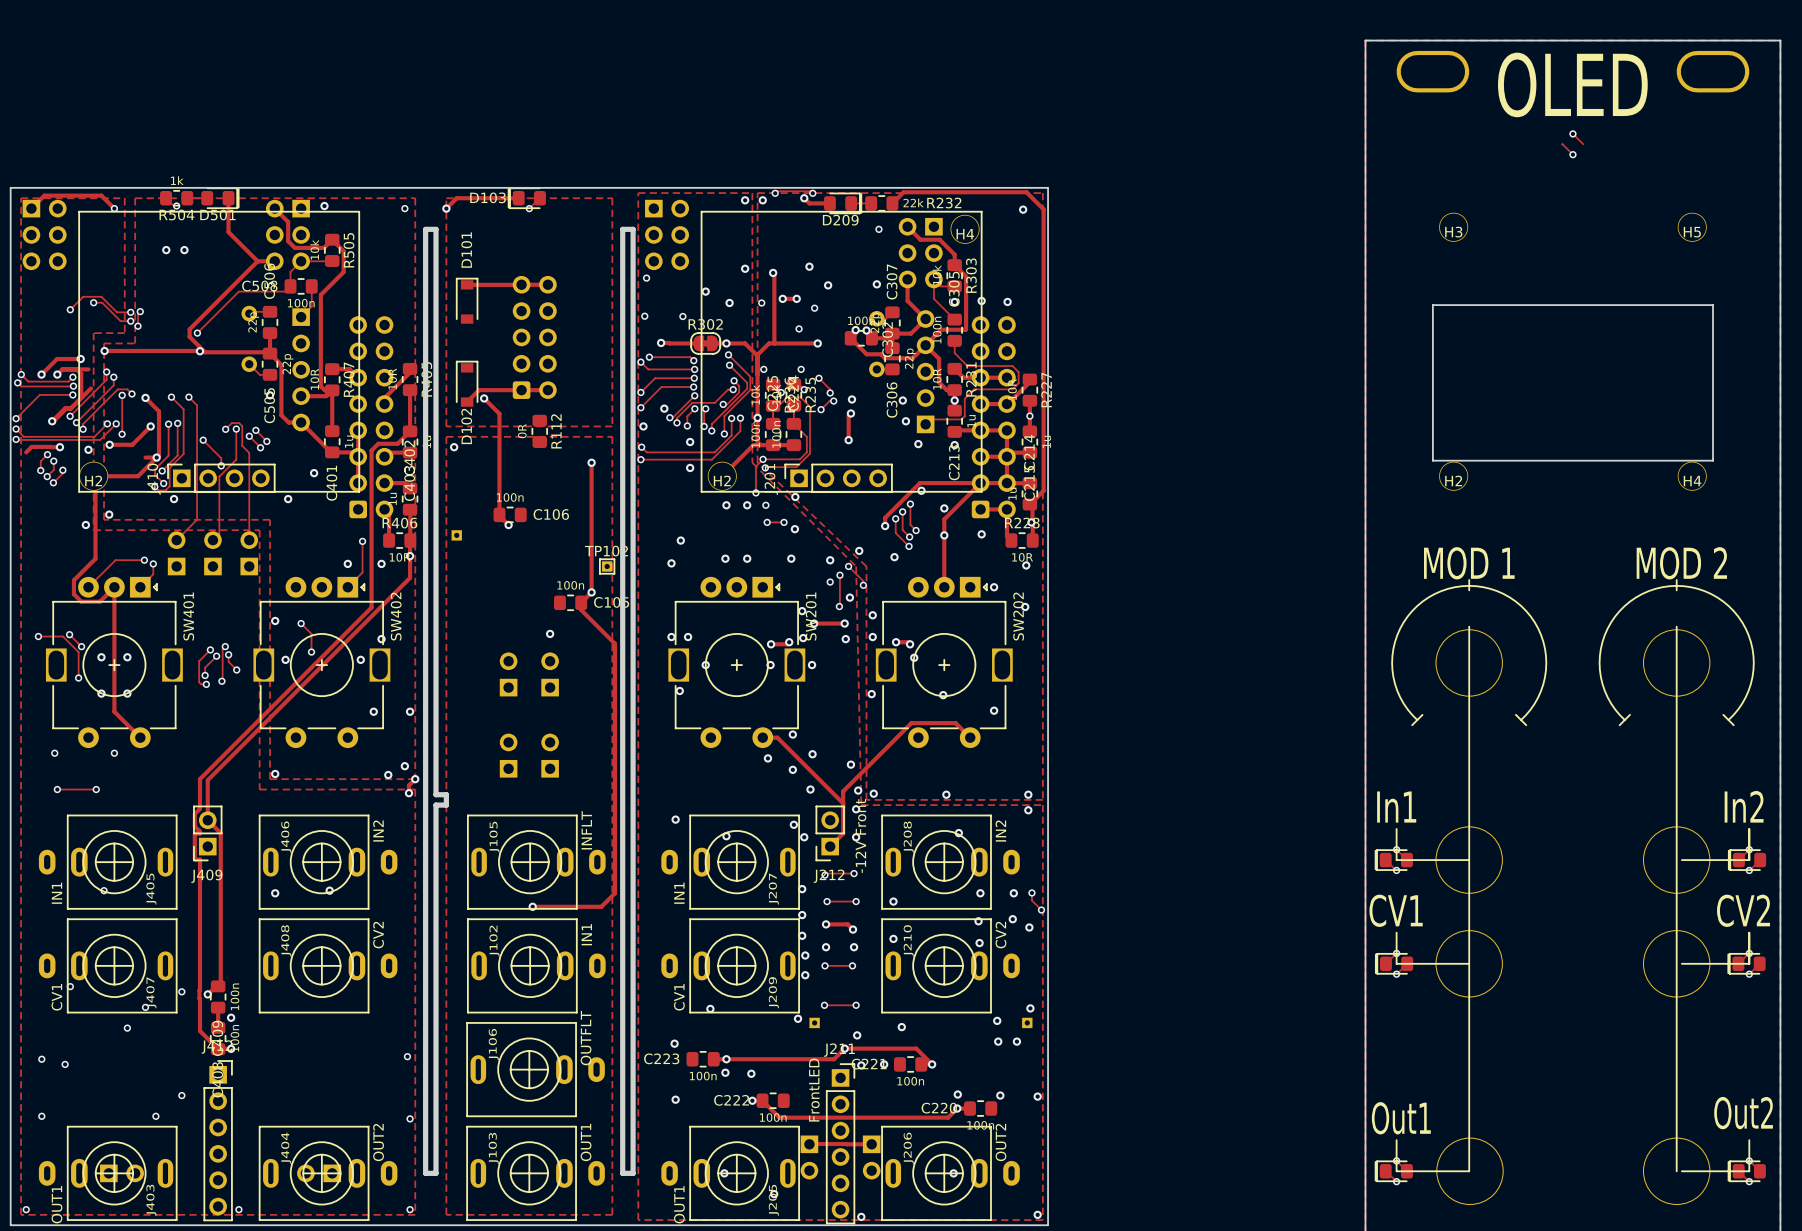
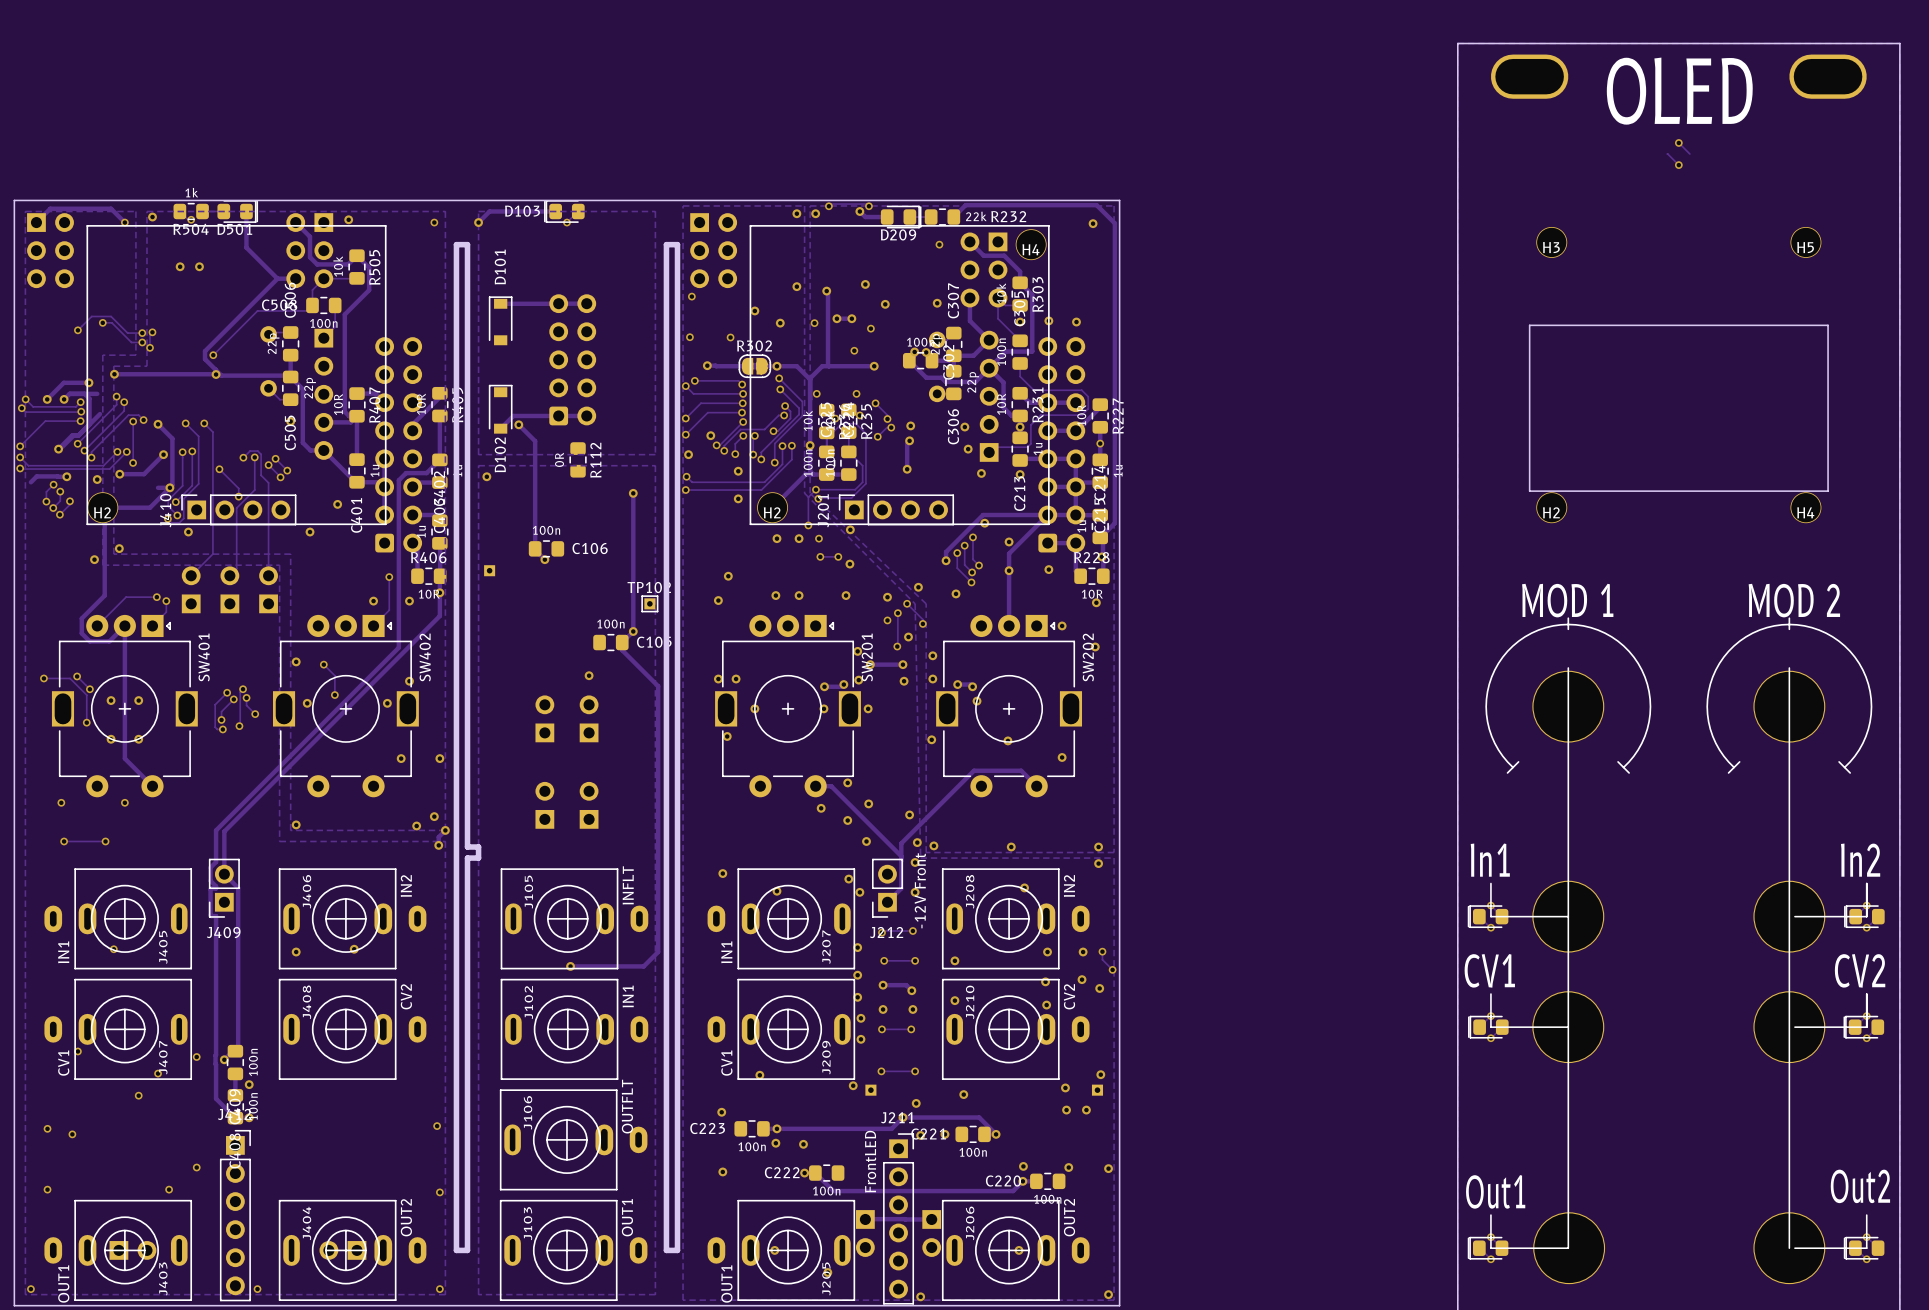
via: none -> (152, 217)

